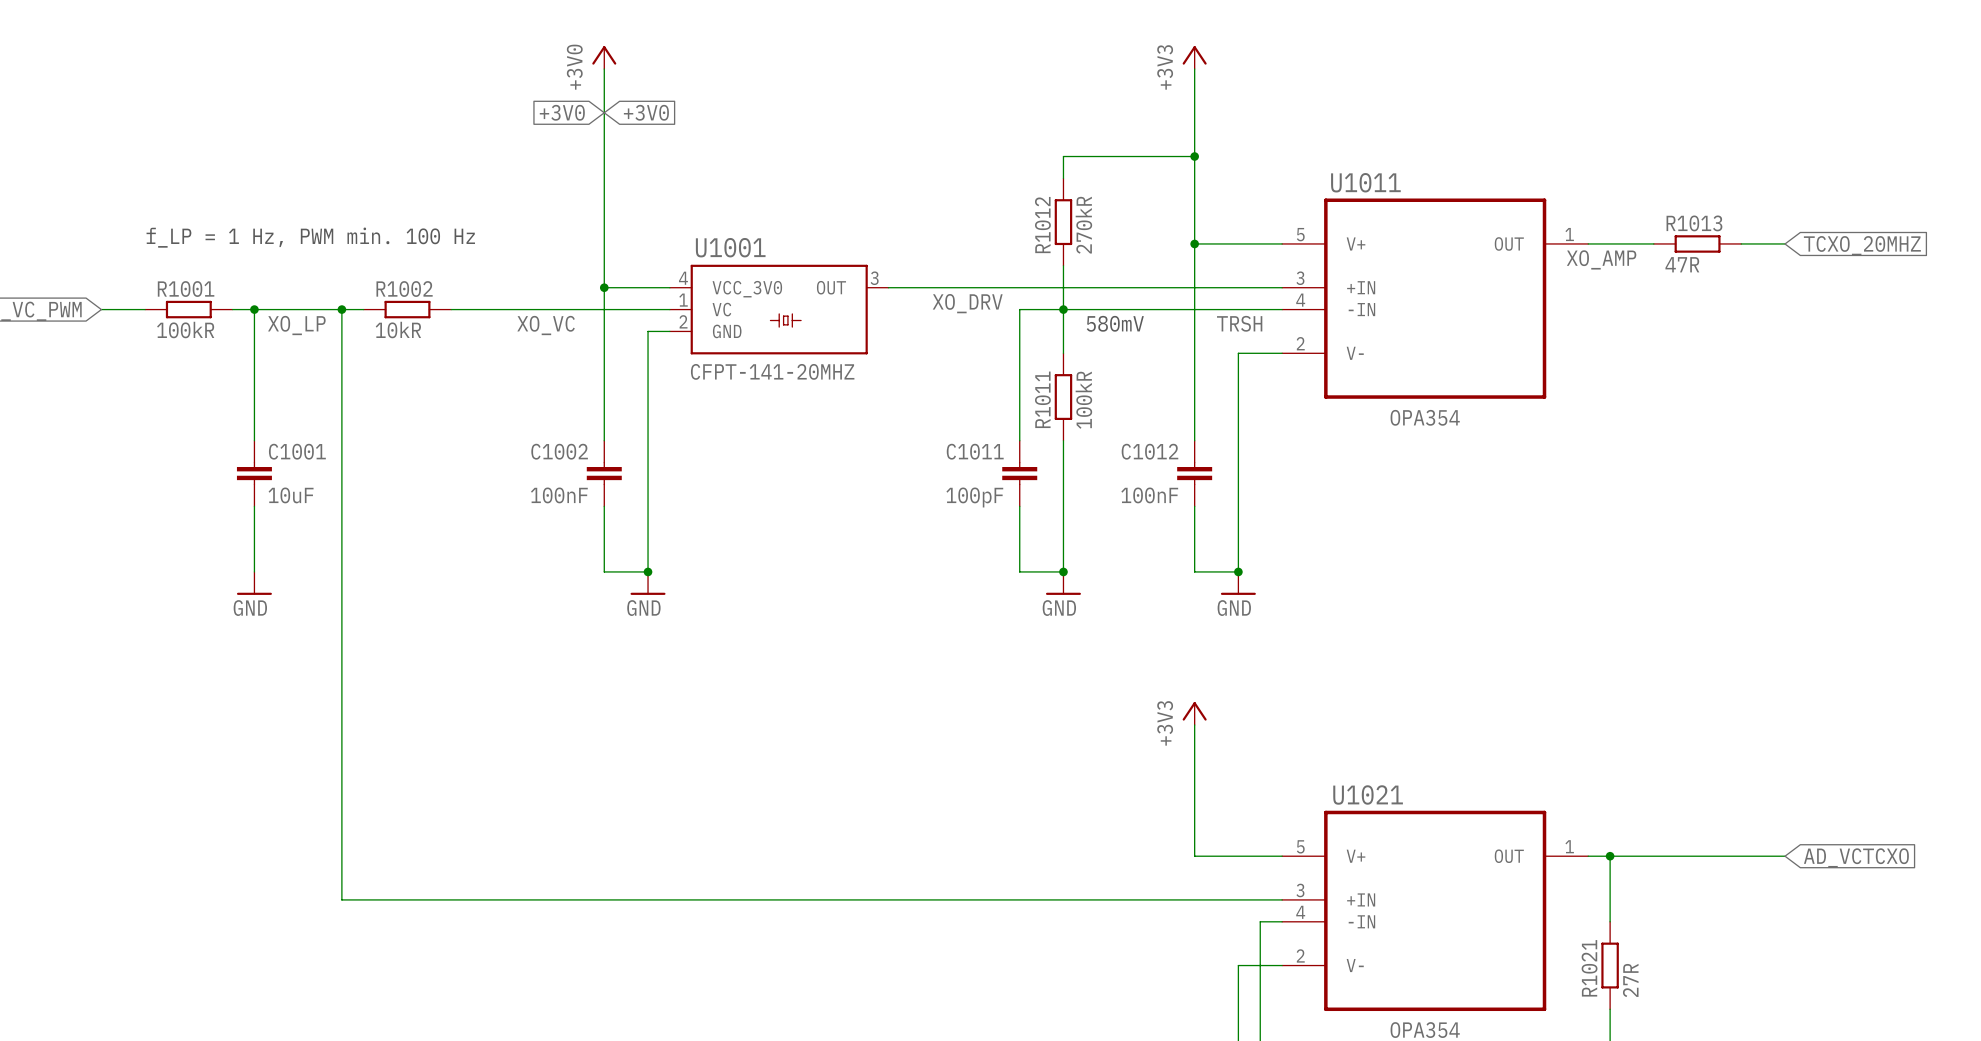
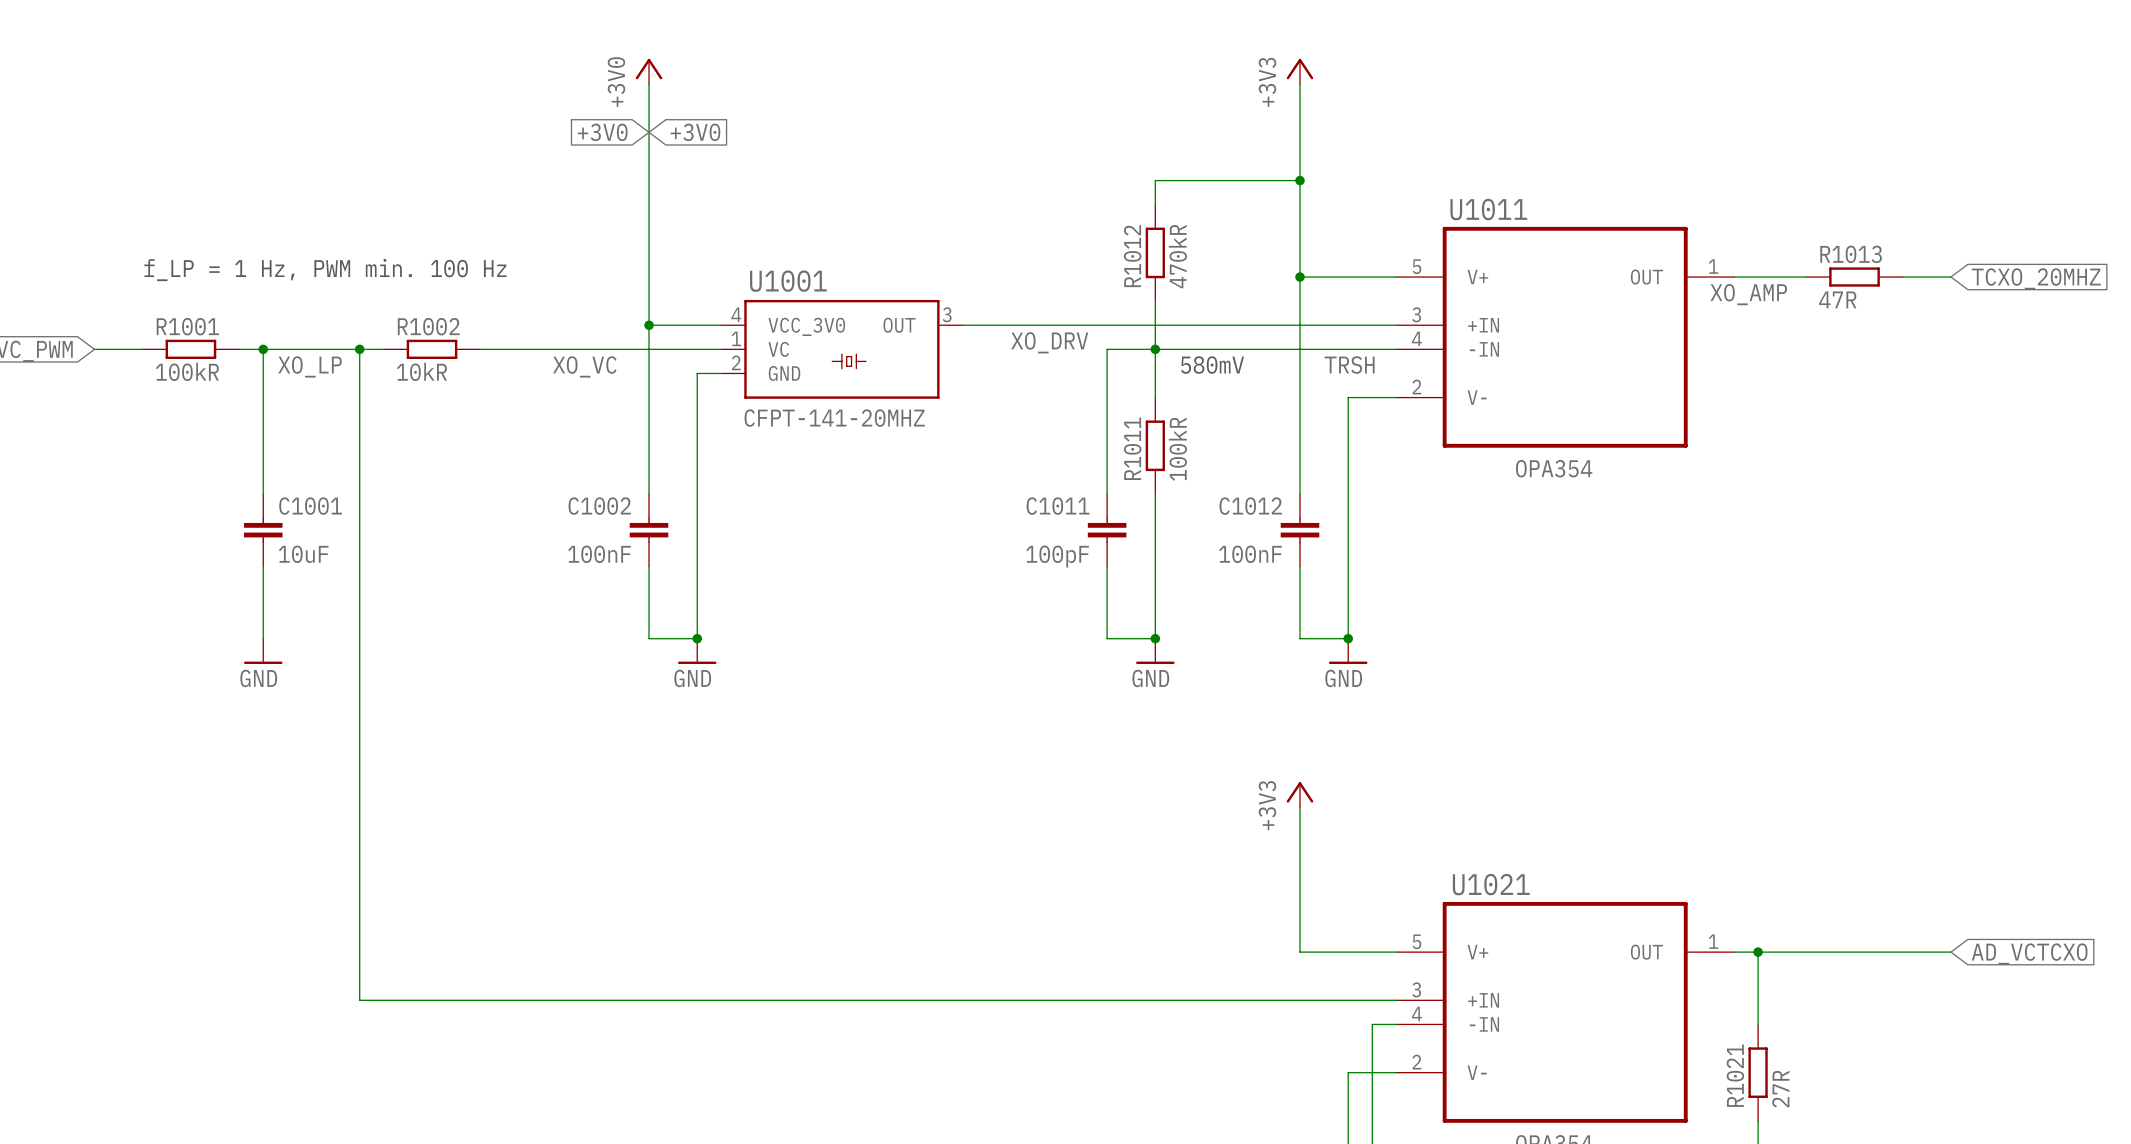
R1012 value: 270kR (1083, 225) -> 470kR (1177, 256)

